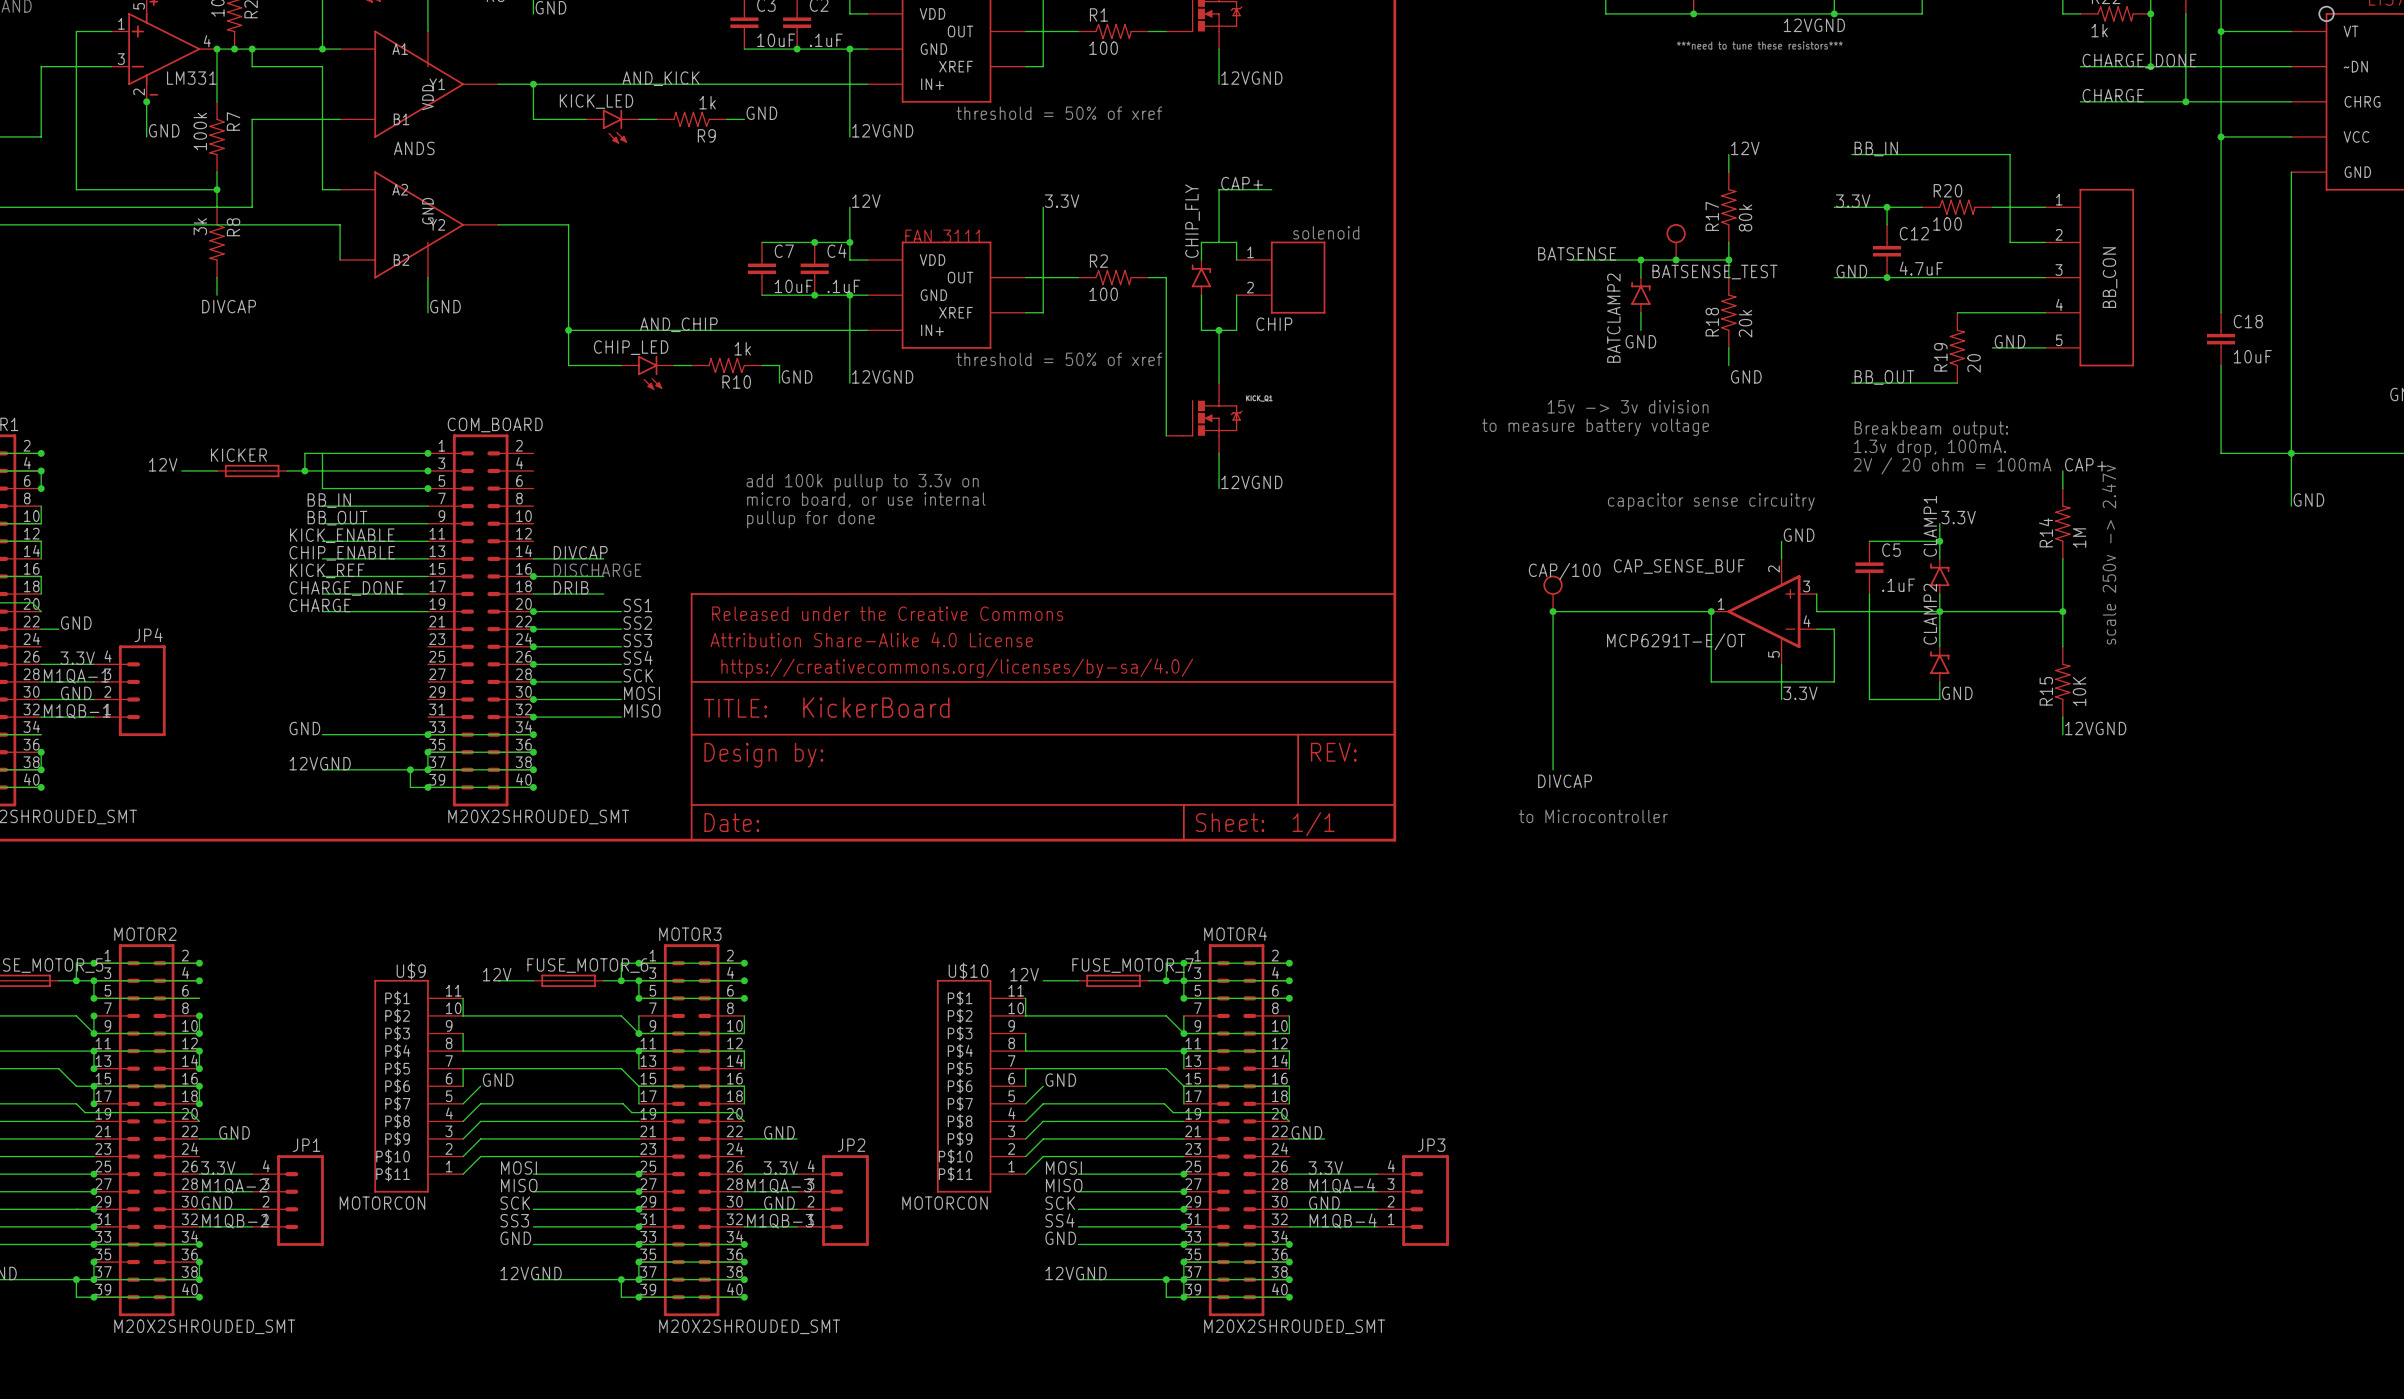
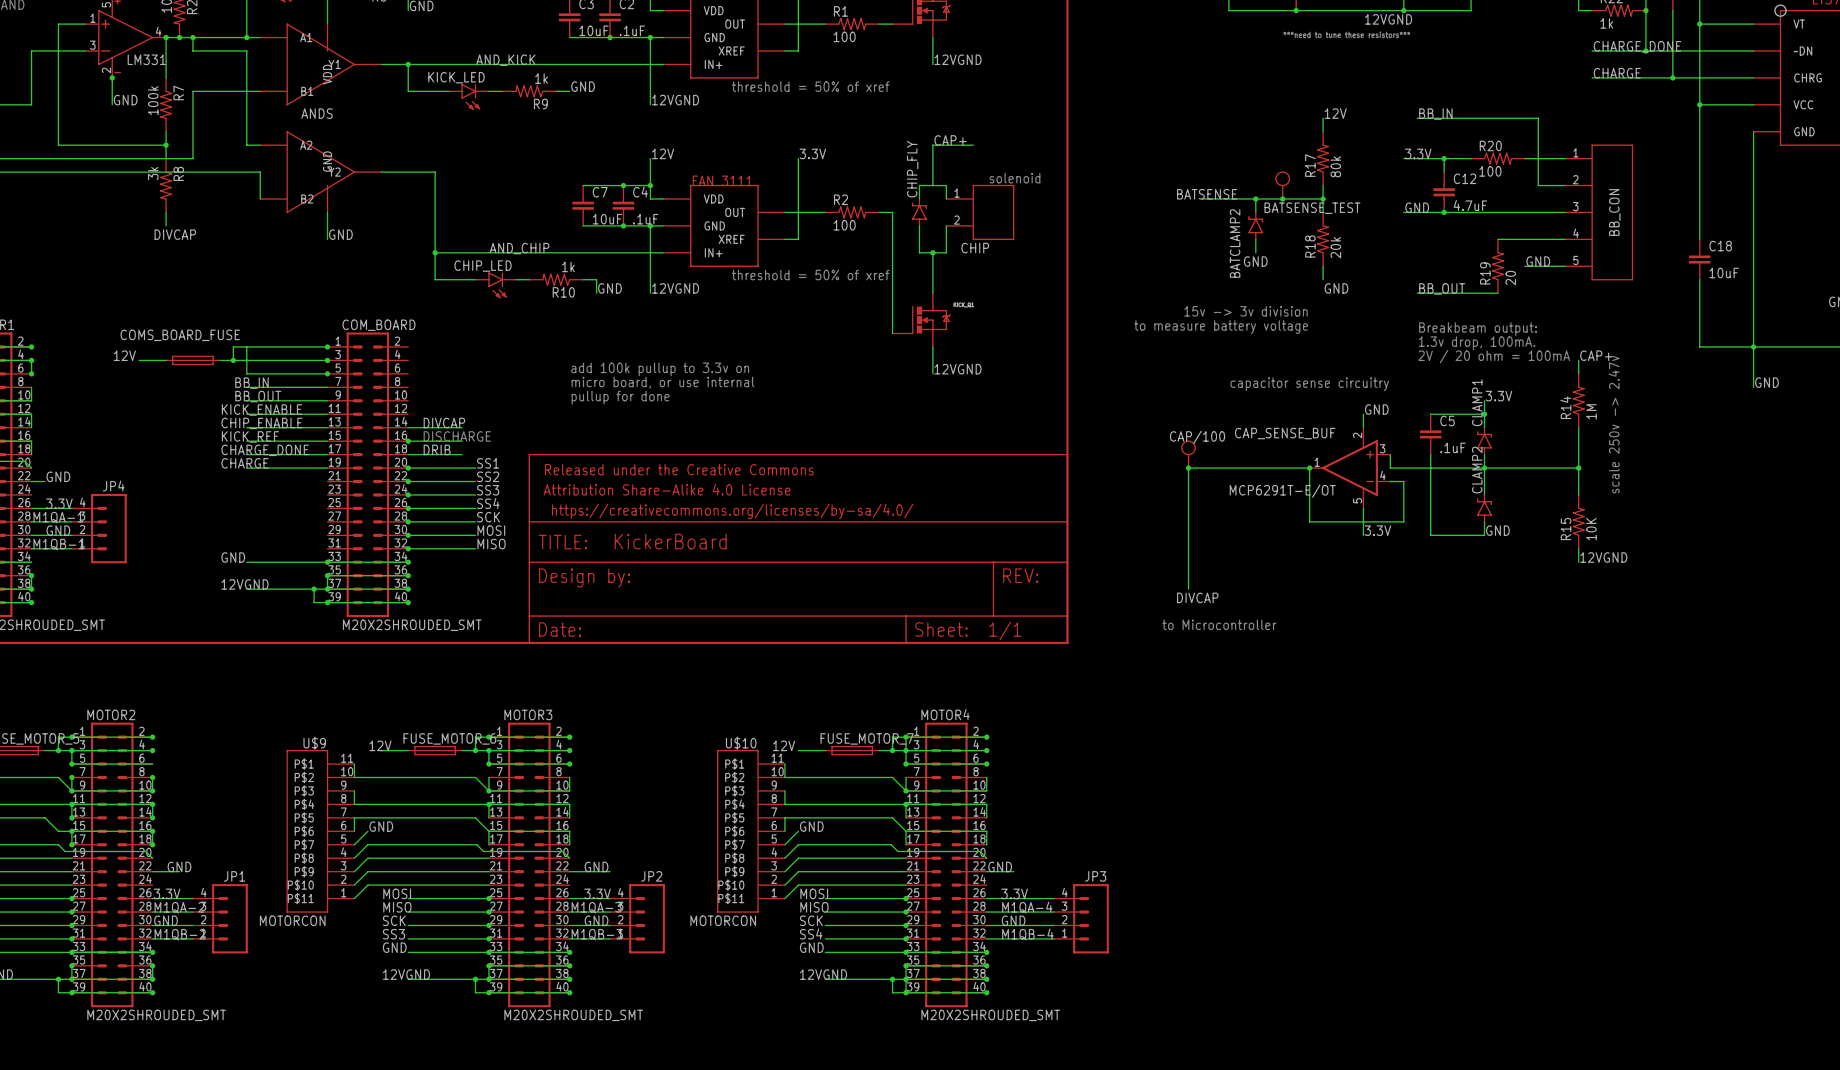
KICKER name: KICKER (238, 455) -> COMS_BOARD_FUSE (180, 335)

